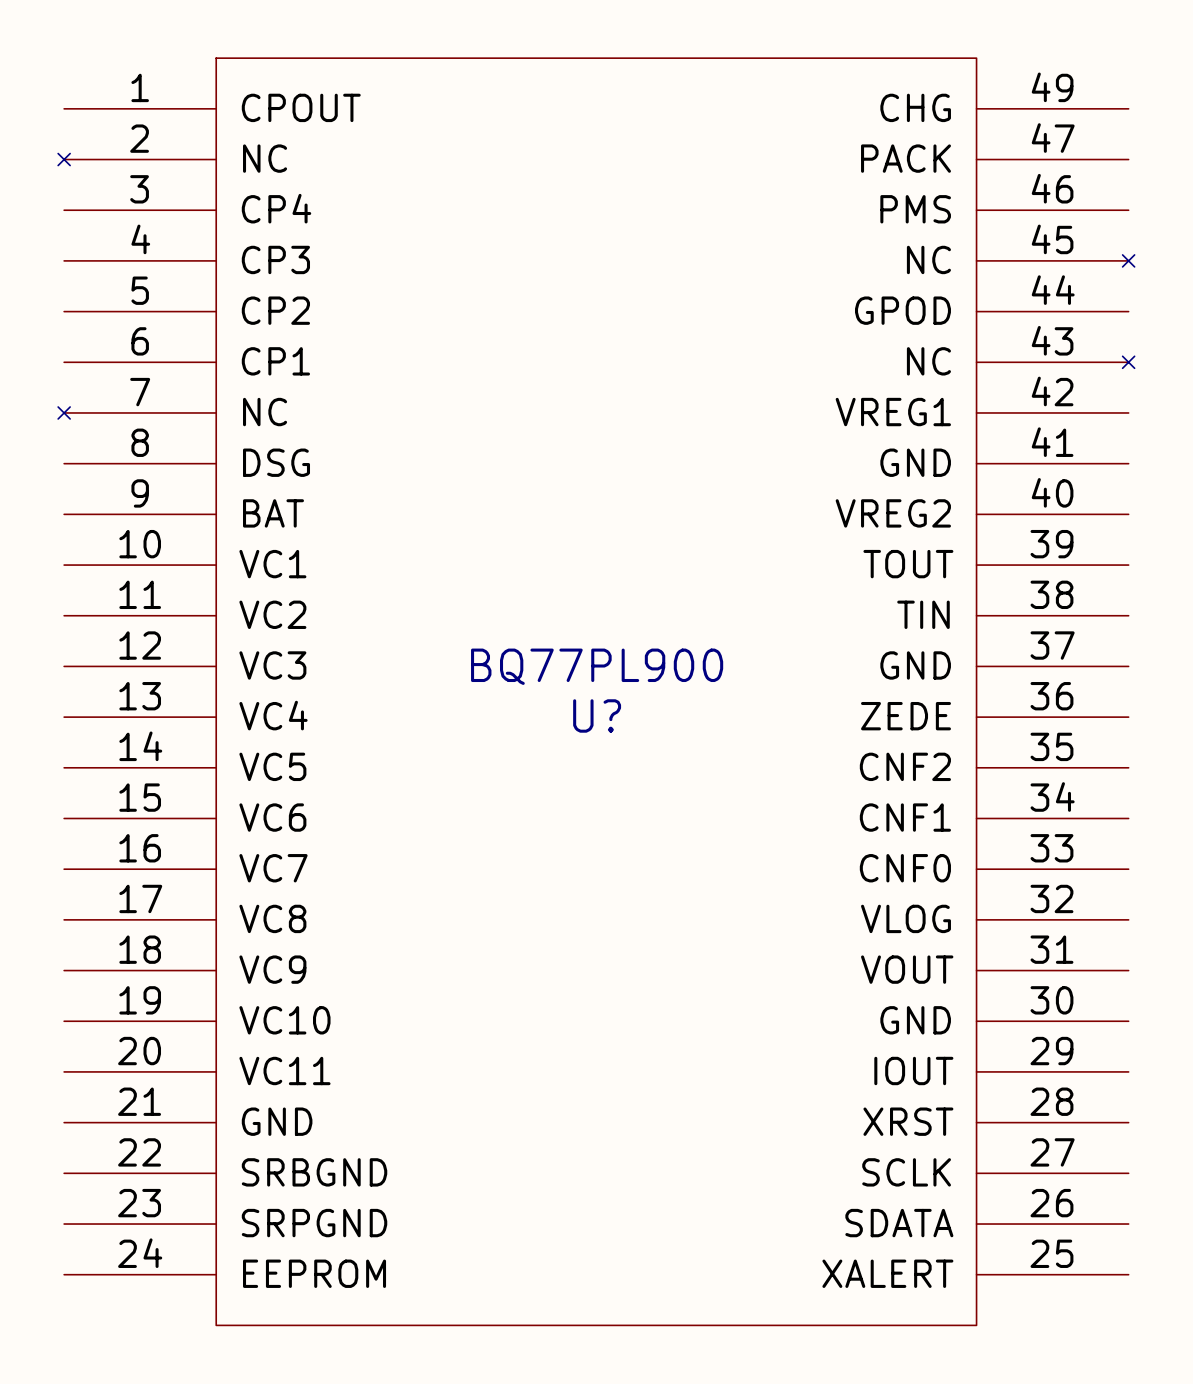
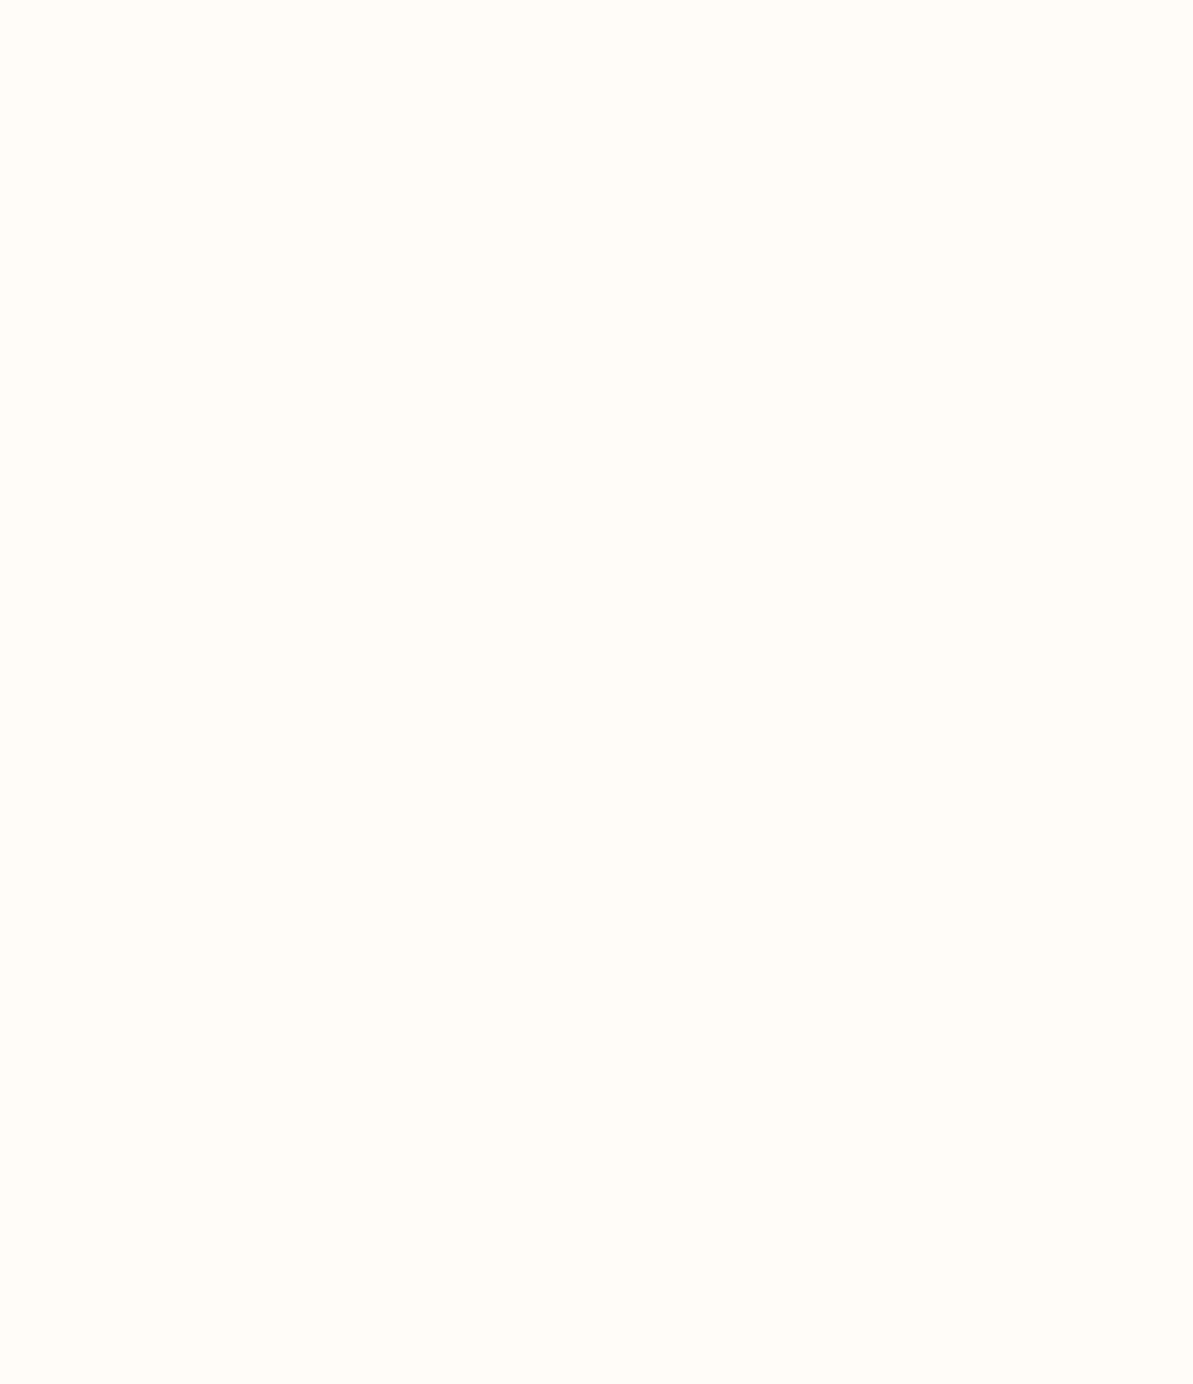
U?: BQ77PL900 (596, 691) -> none

